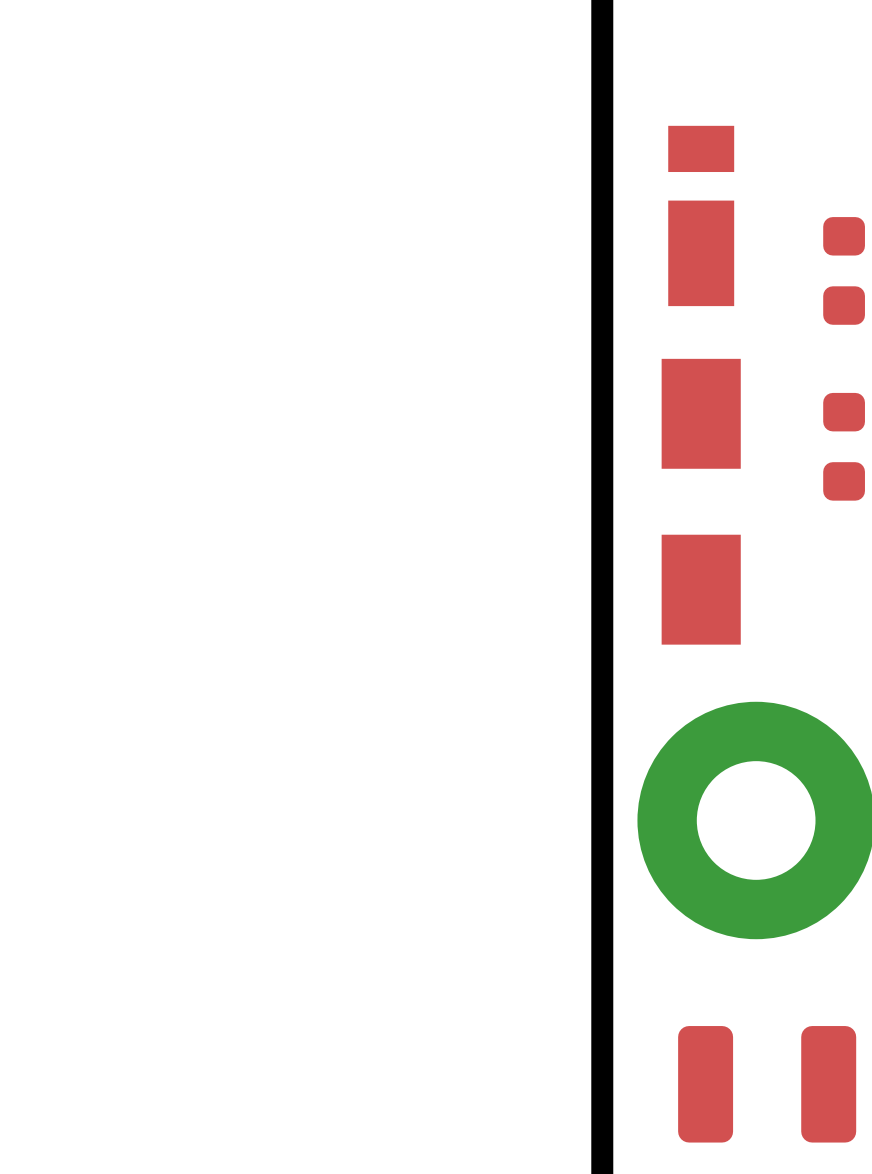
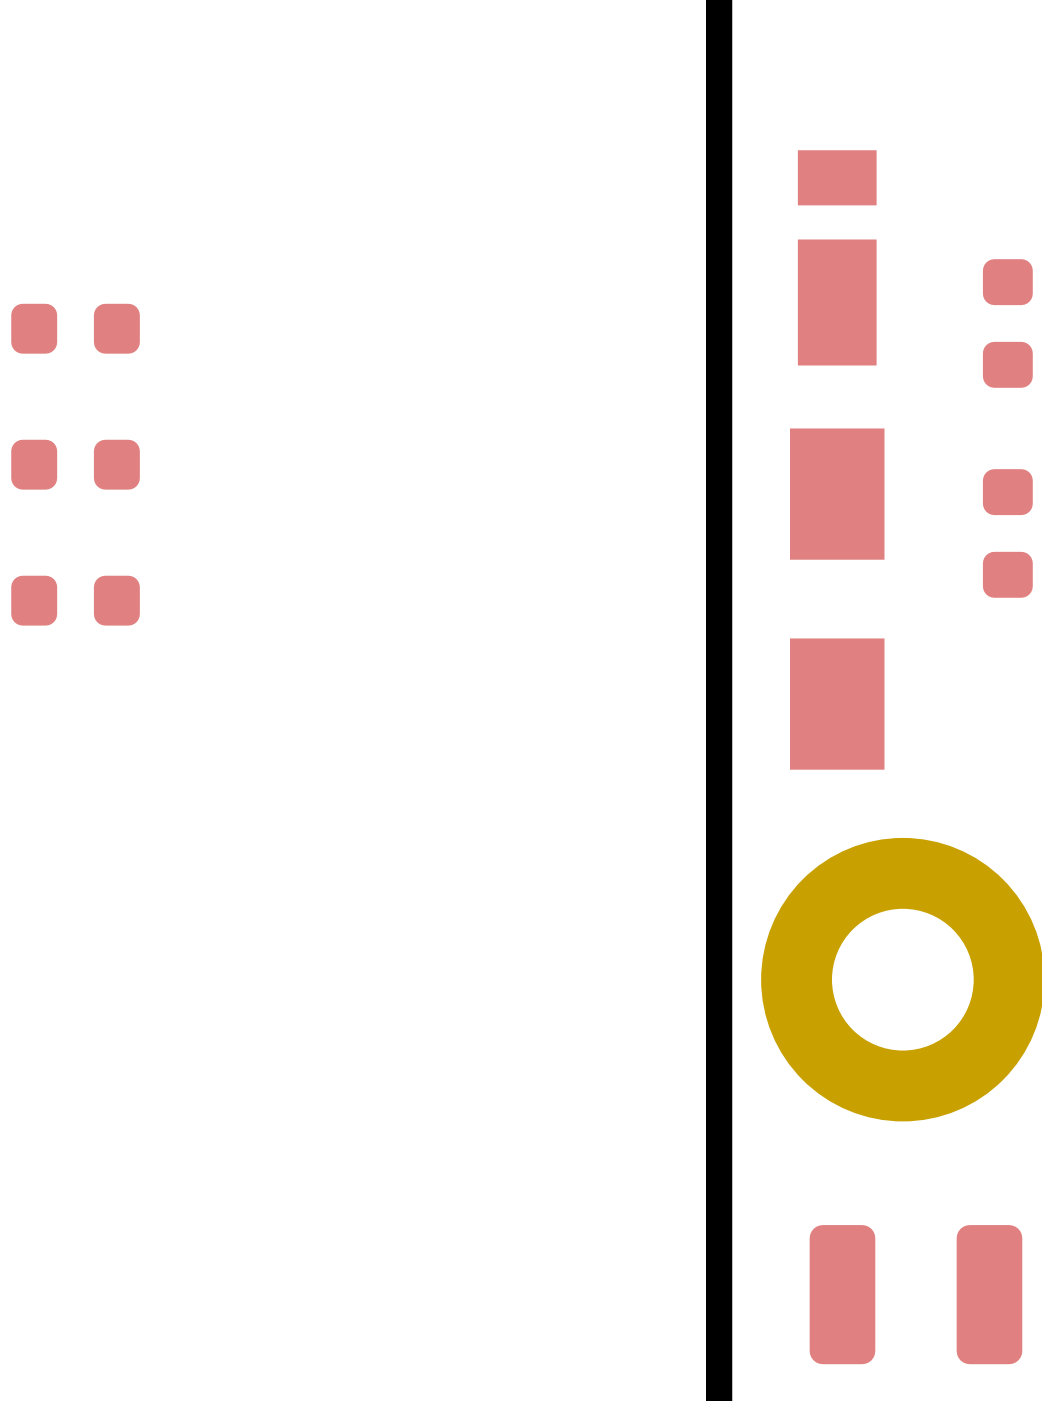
part: none -> (75, 328)
part: none -> (75, 464)
part: none -> (75, 600)

